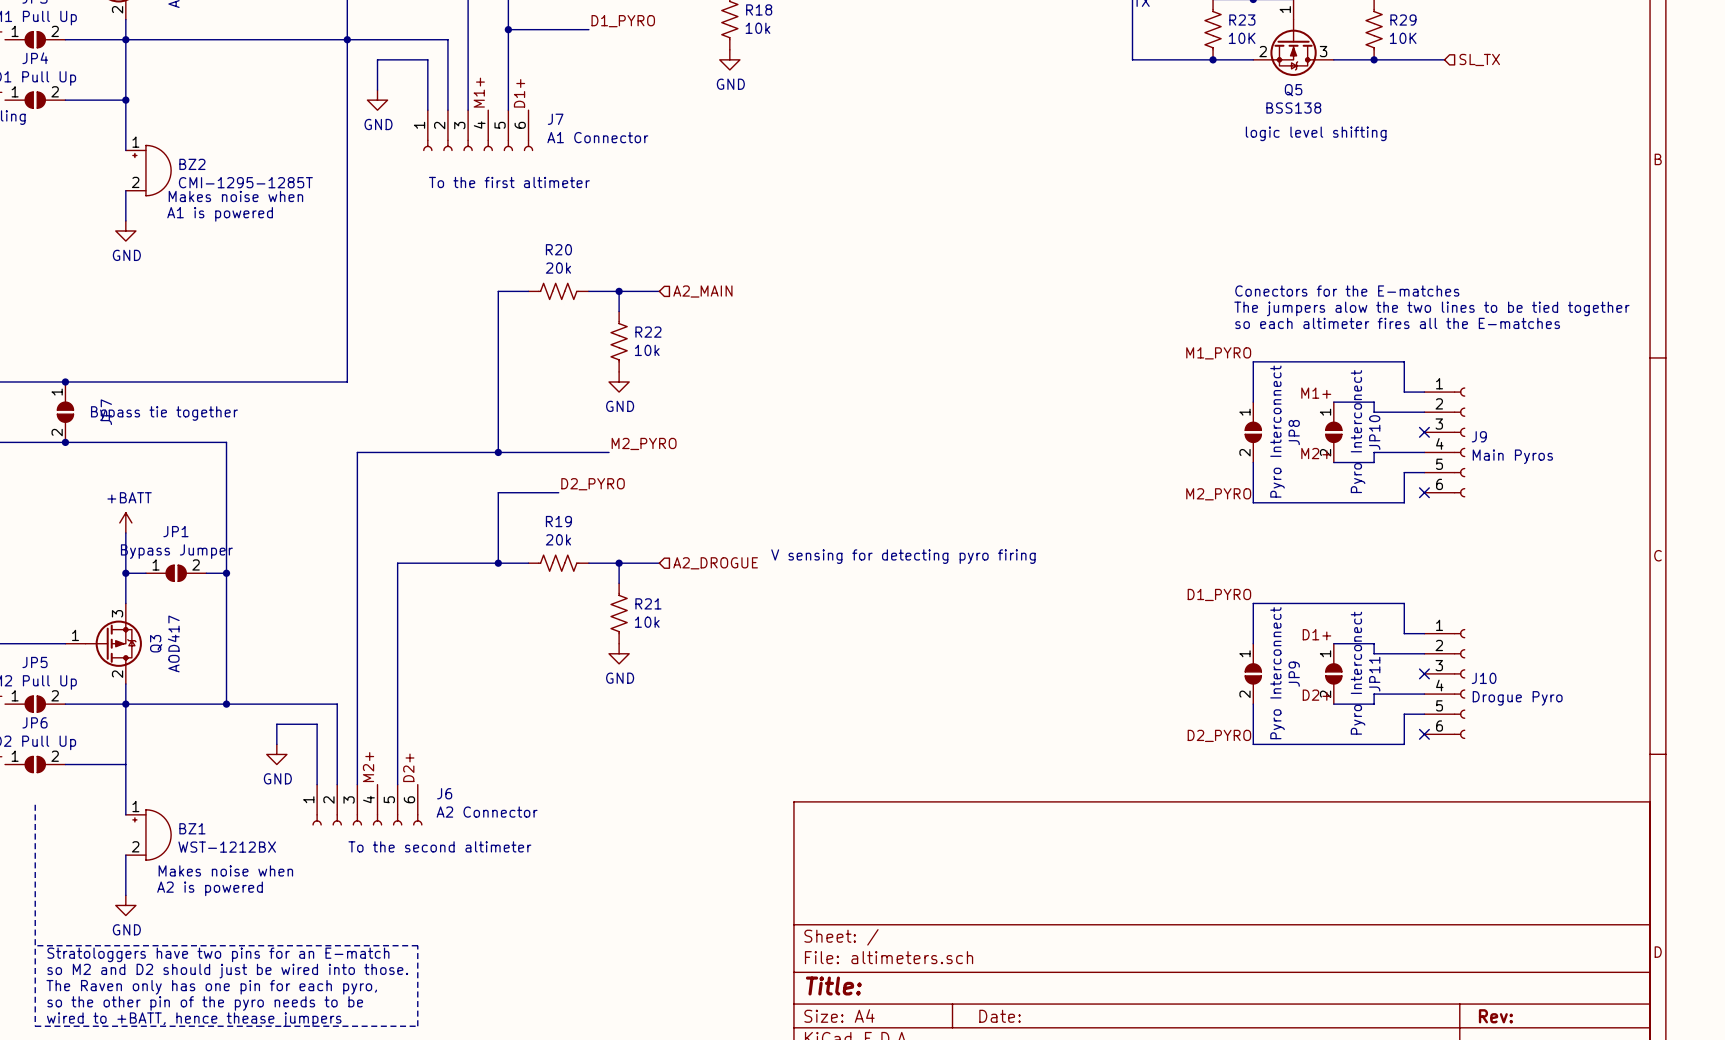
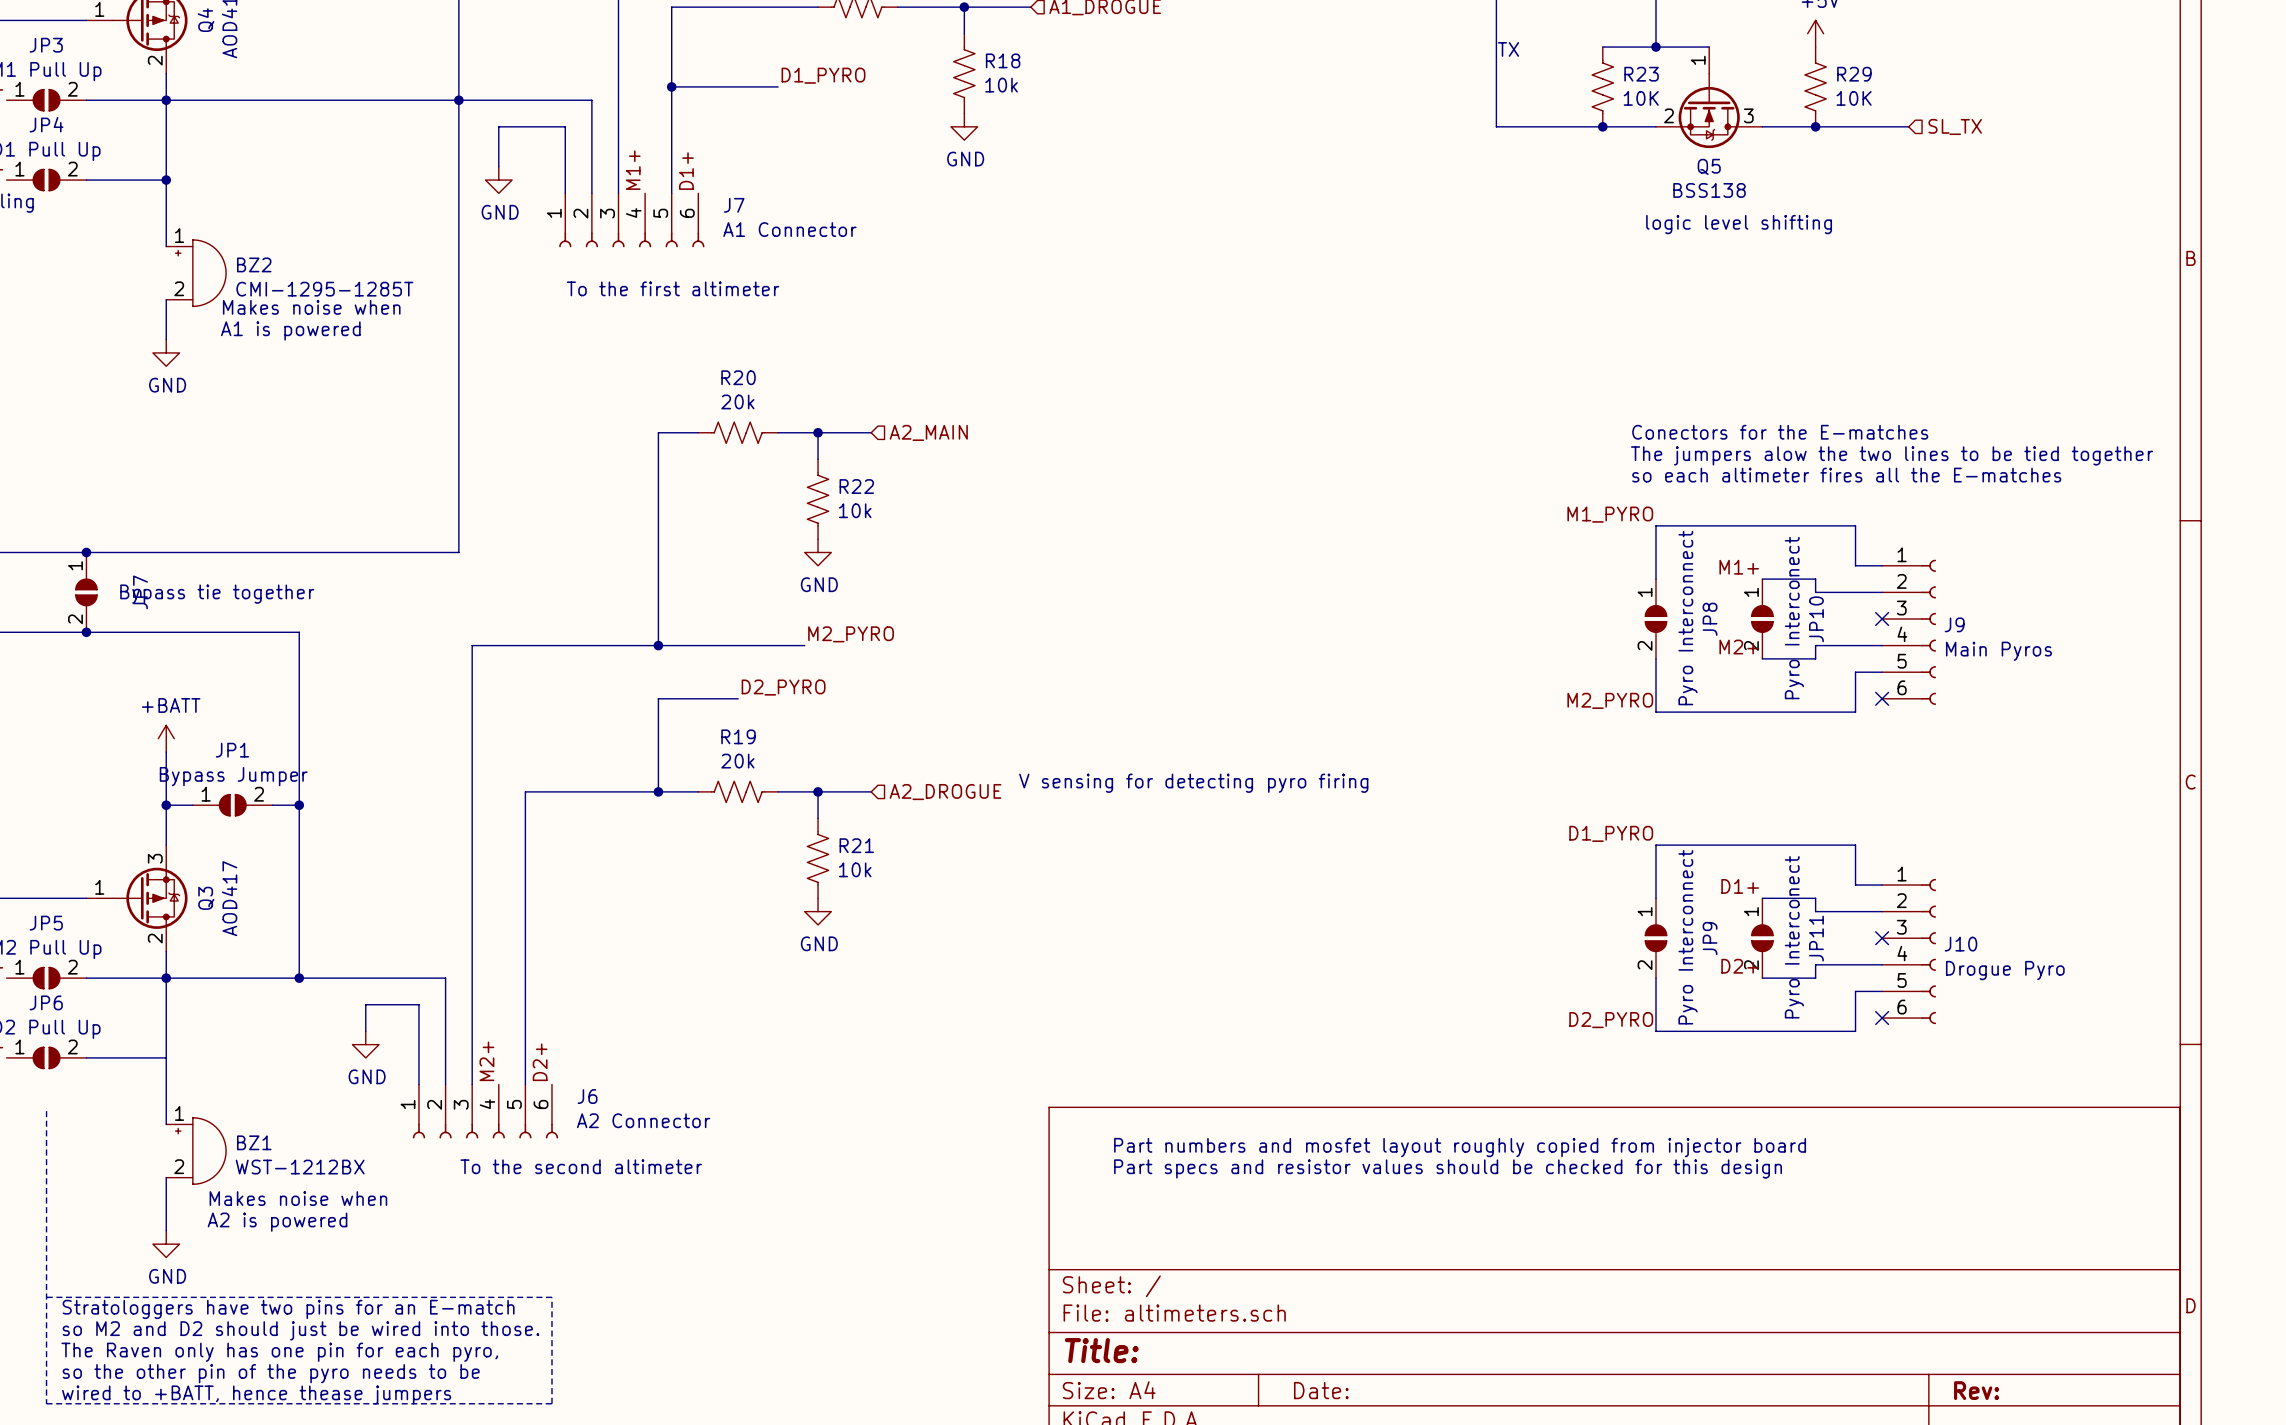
text: none -> Part numbers and mosfet layout roughly copied from injector board (1460, 1147)
text: none -> Part specs and resistor values should be checked for this design (1448, 1168)

